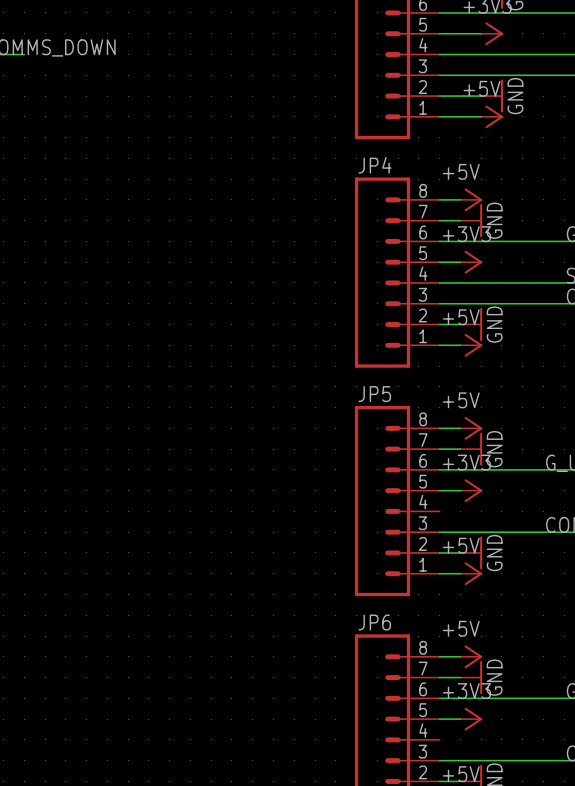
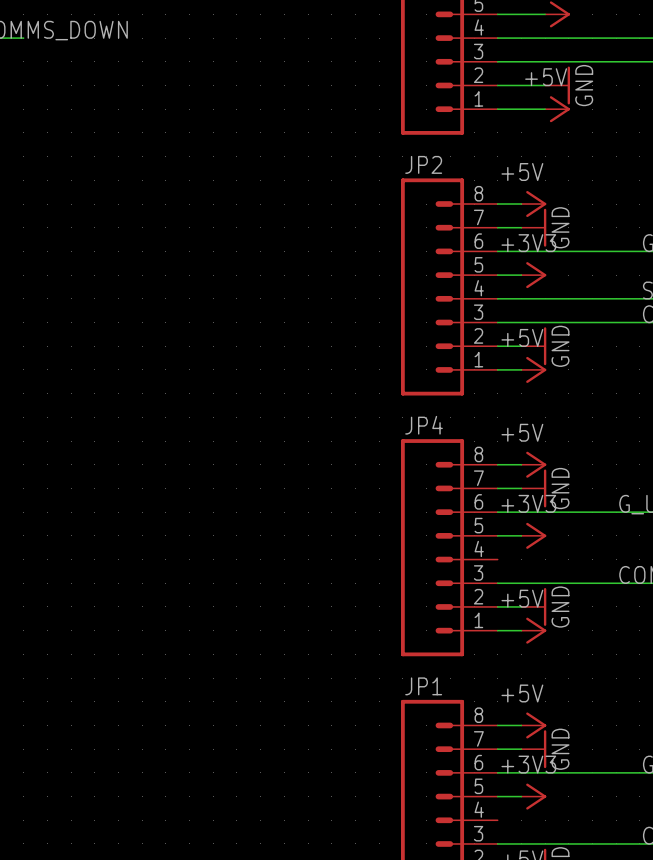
JP4 name: JP4 (375, 165) -> JP2 (423, 164)
JP5 name: JP5 (374, 394) -> JP4 (424, 425)
JP6 name: JP6 (374, 622) -> JP1 (423, 686)

